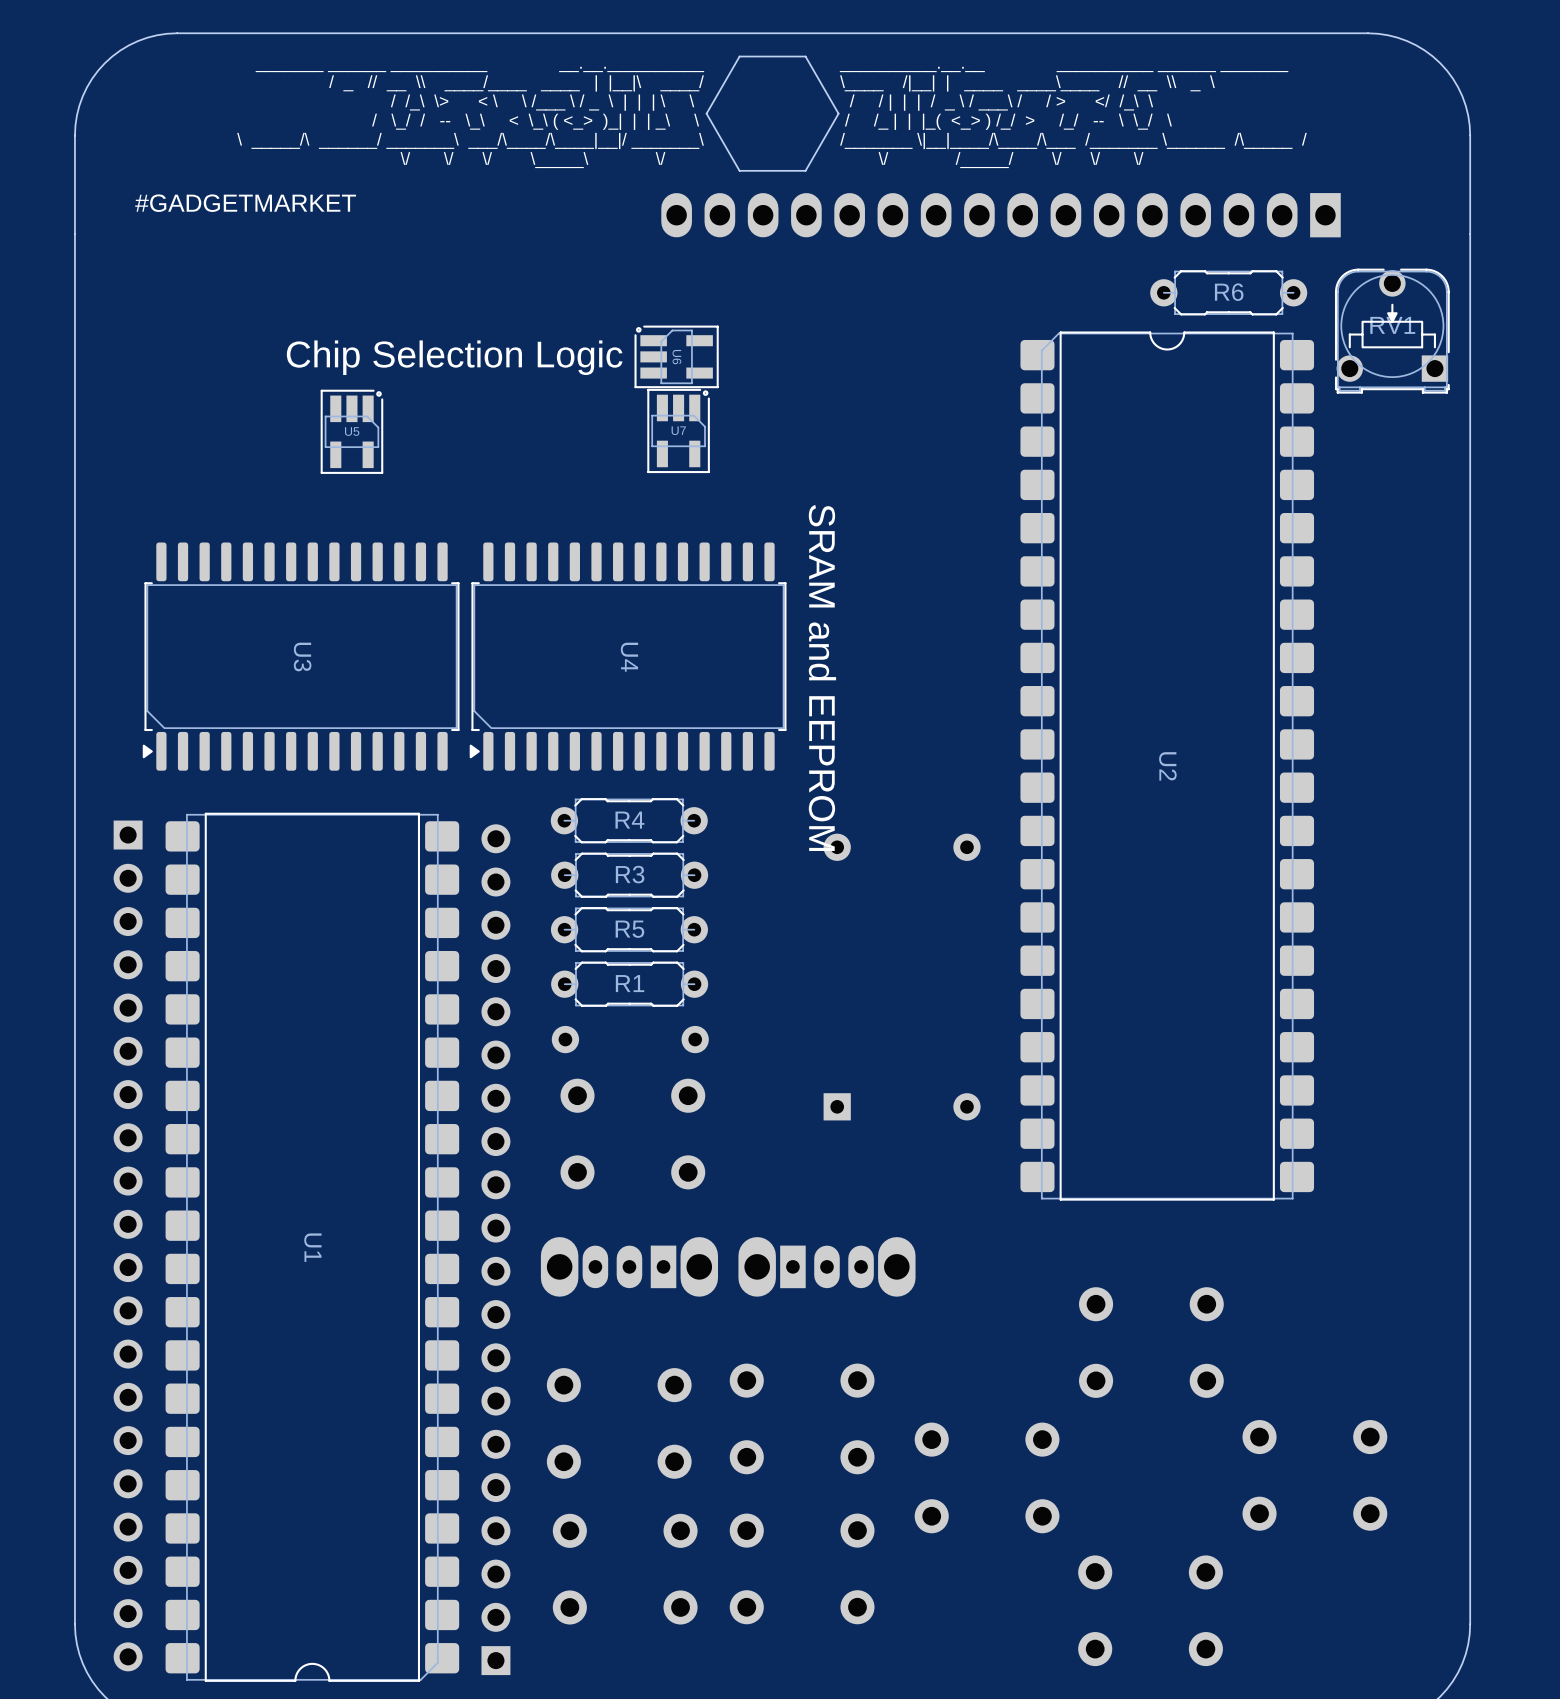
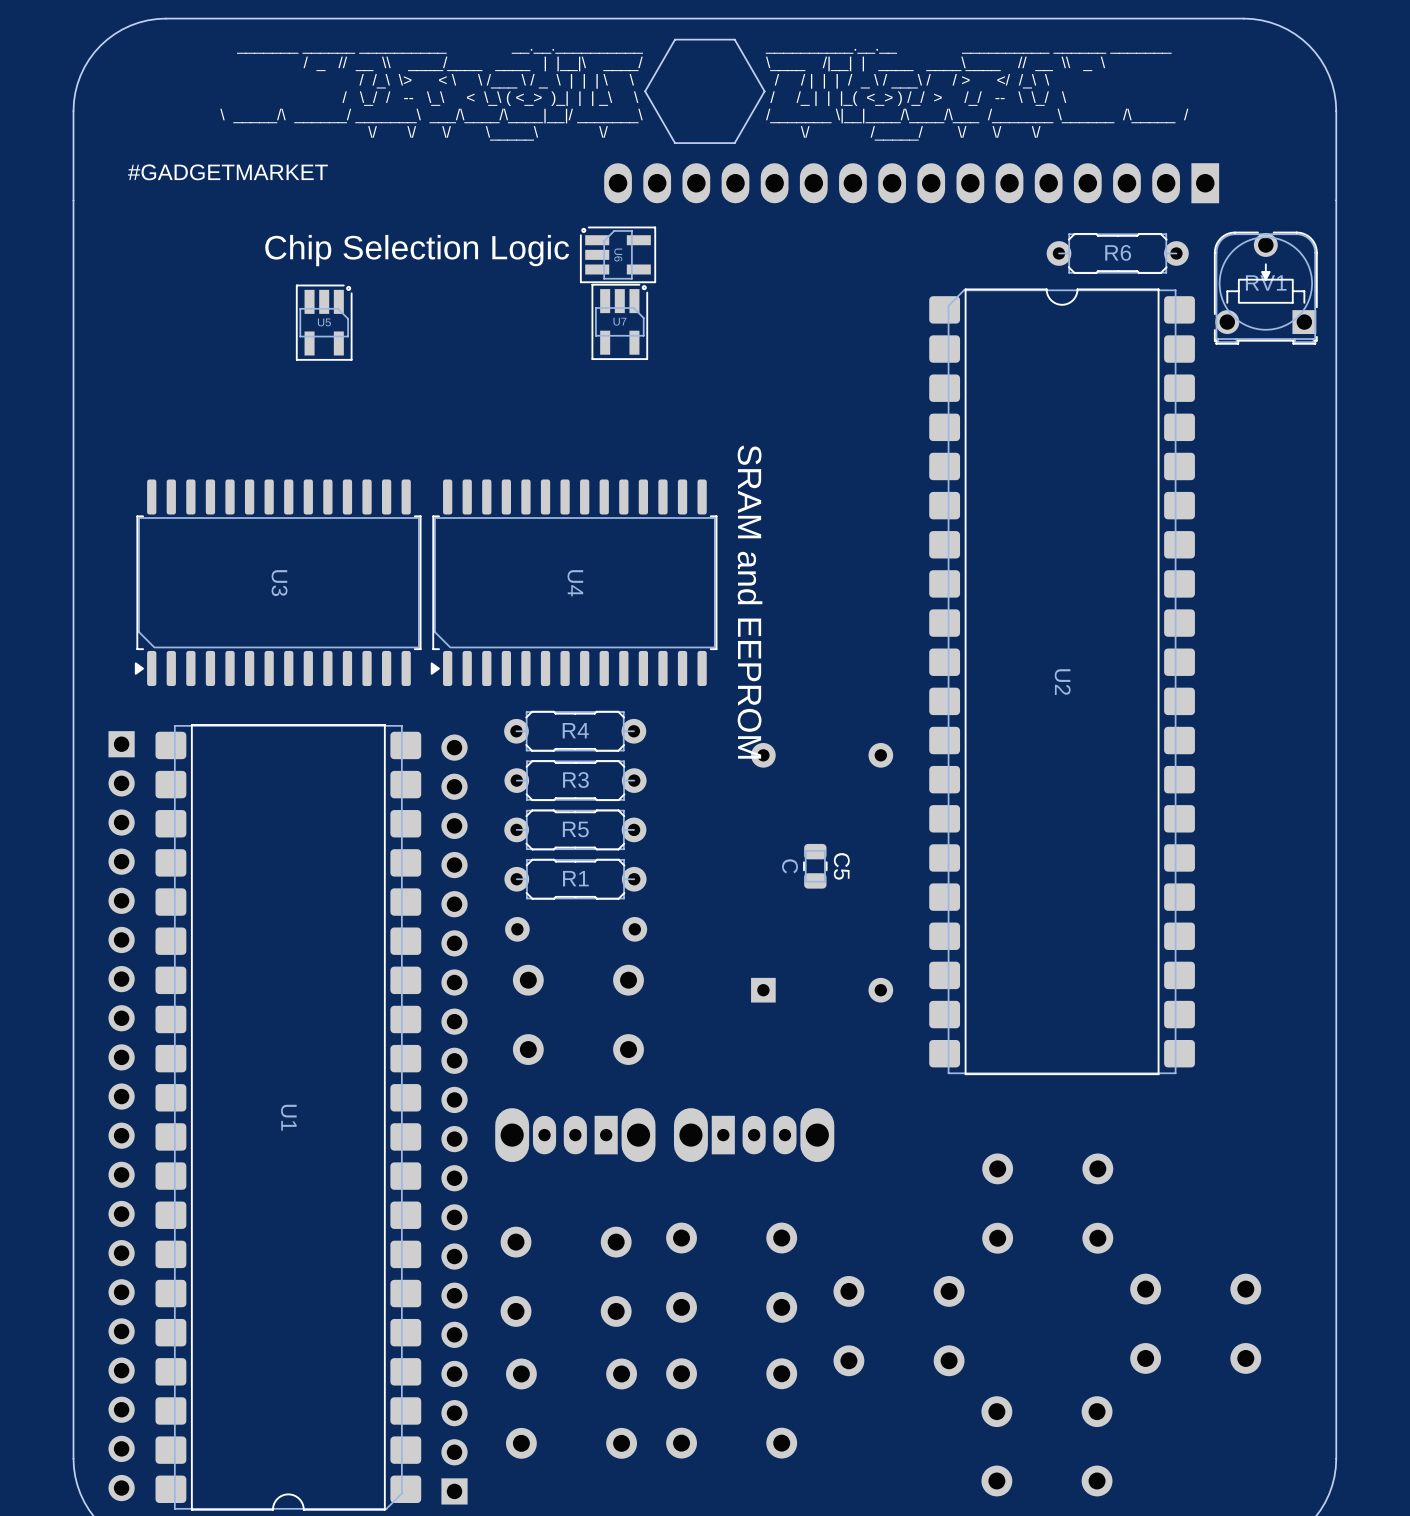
U6 position: (676, 356) -> (618, 254)
text position: Chip Selection Logic (454, 357) -> Chip Selection Logic (417, 250)
U7 position: (678, 430) -> (619, 321)
U5 position: (351, 431) -> (324, 322)
C5: none -> C (815, 866)

